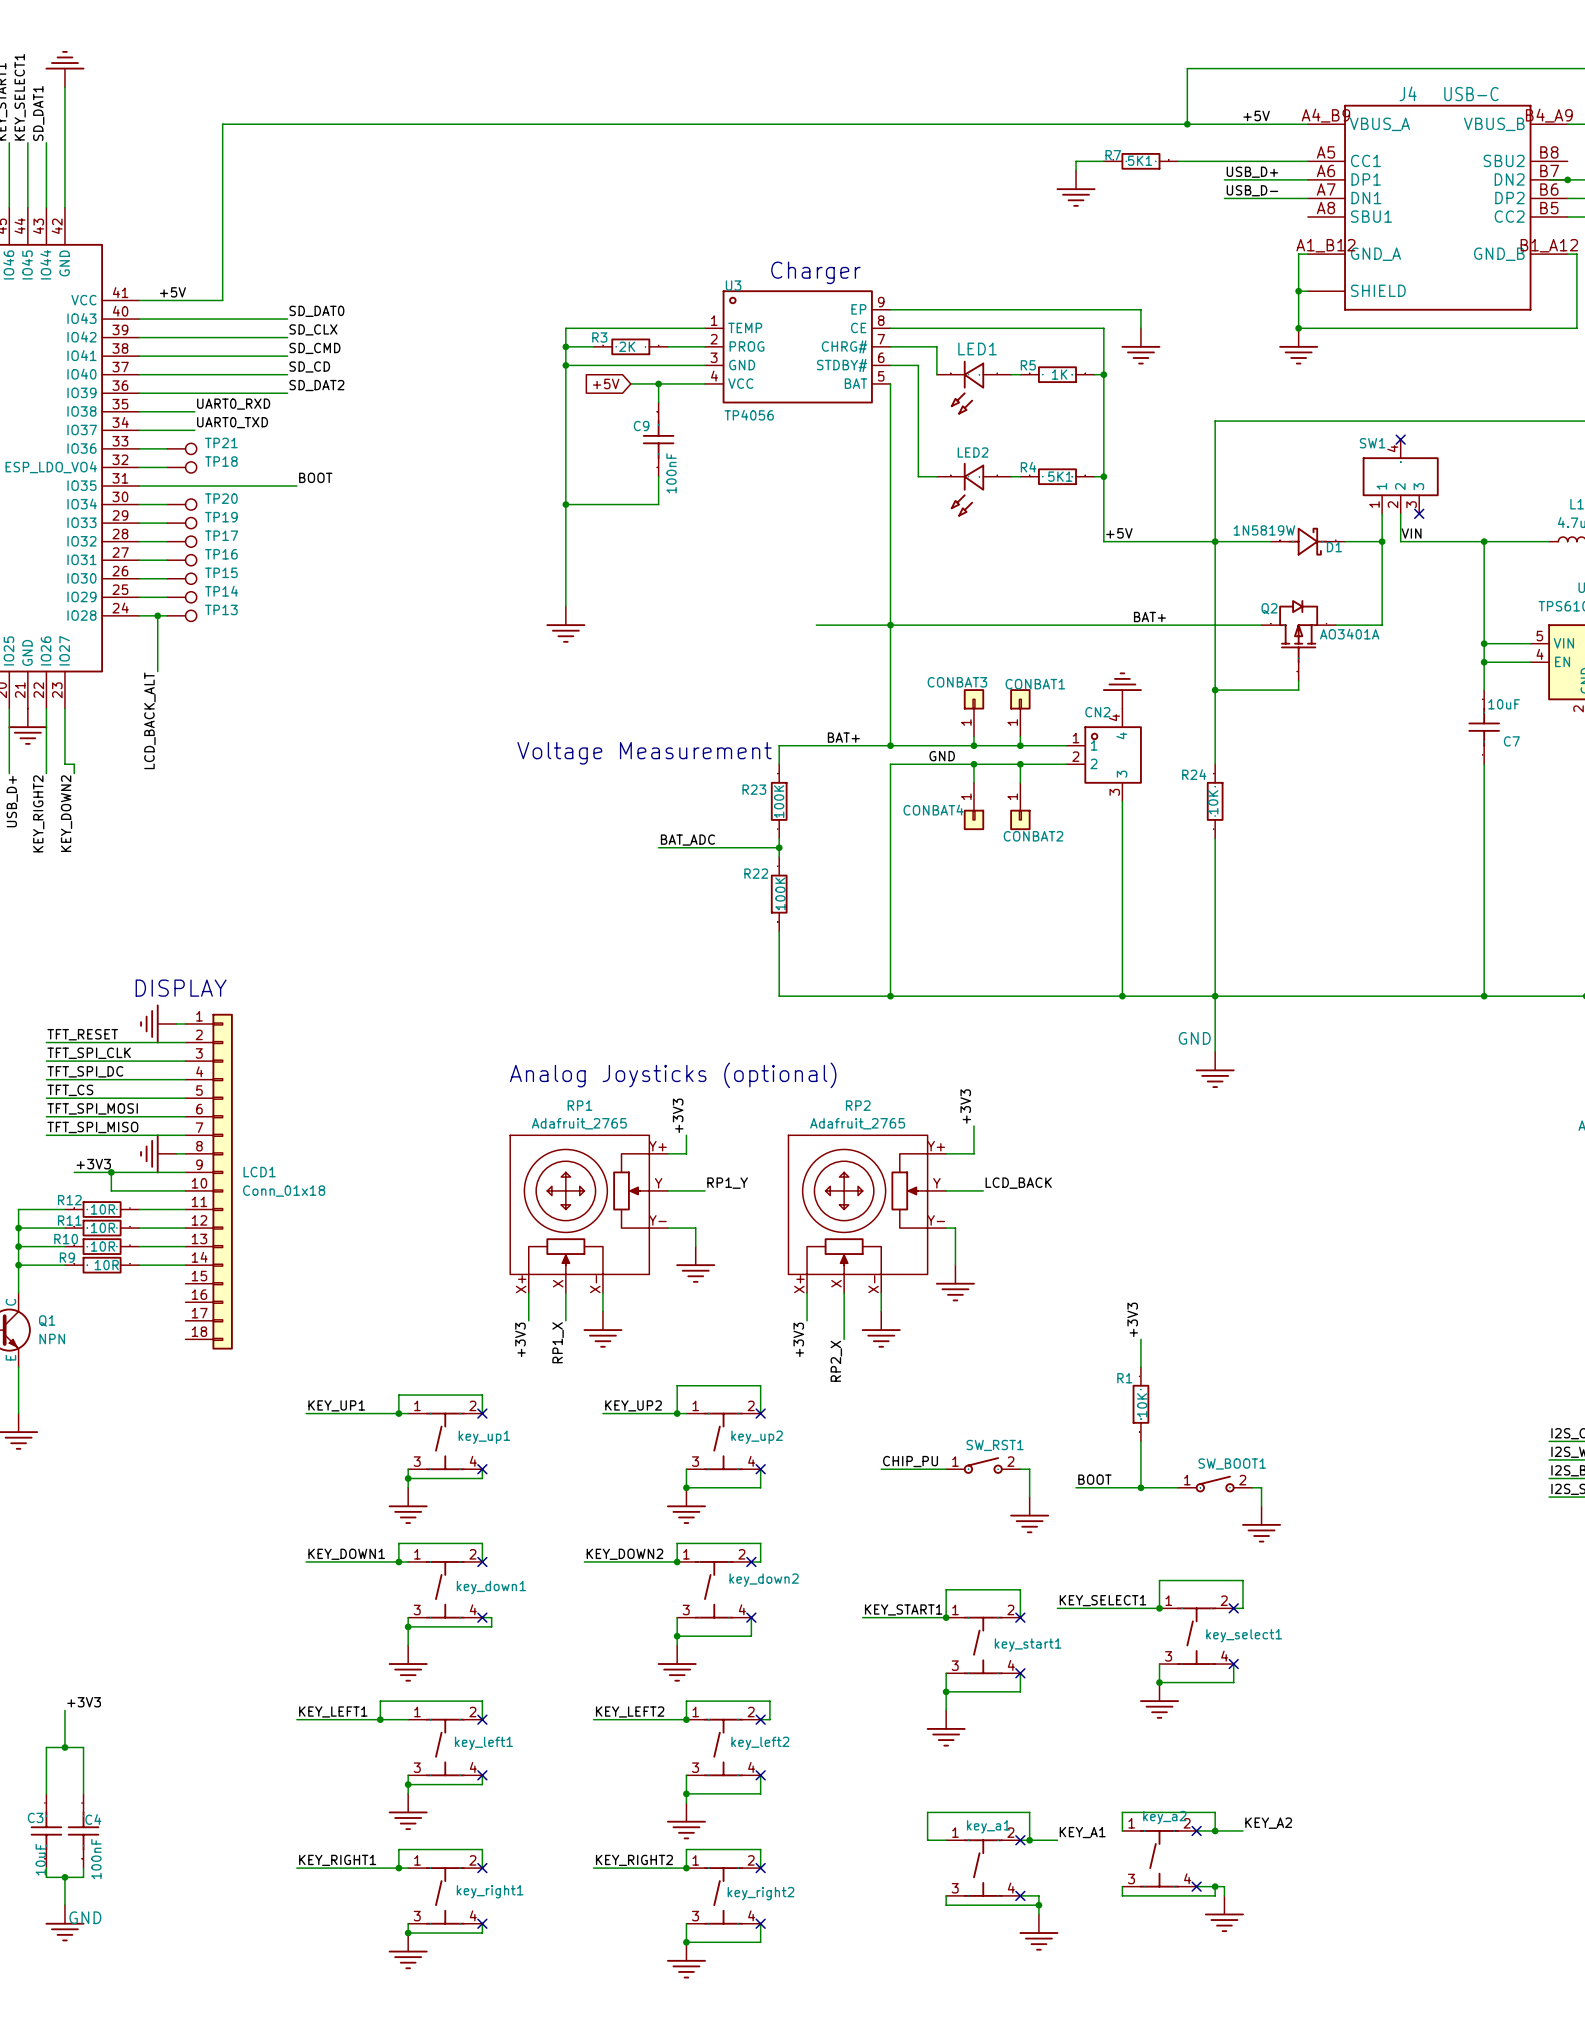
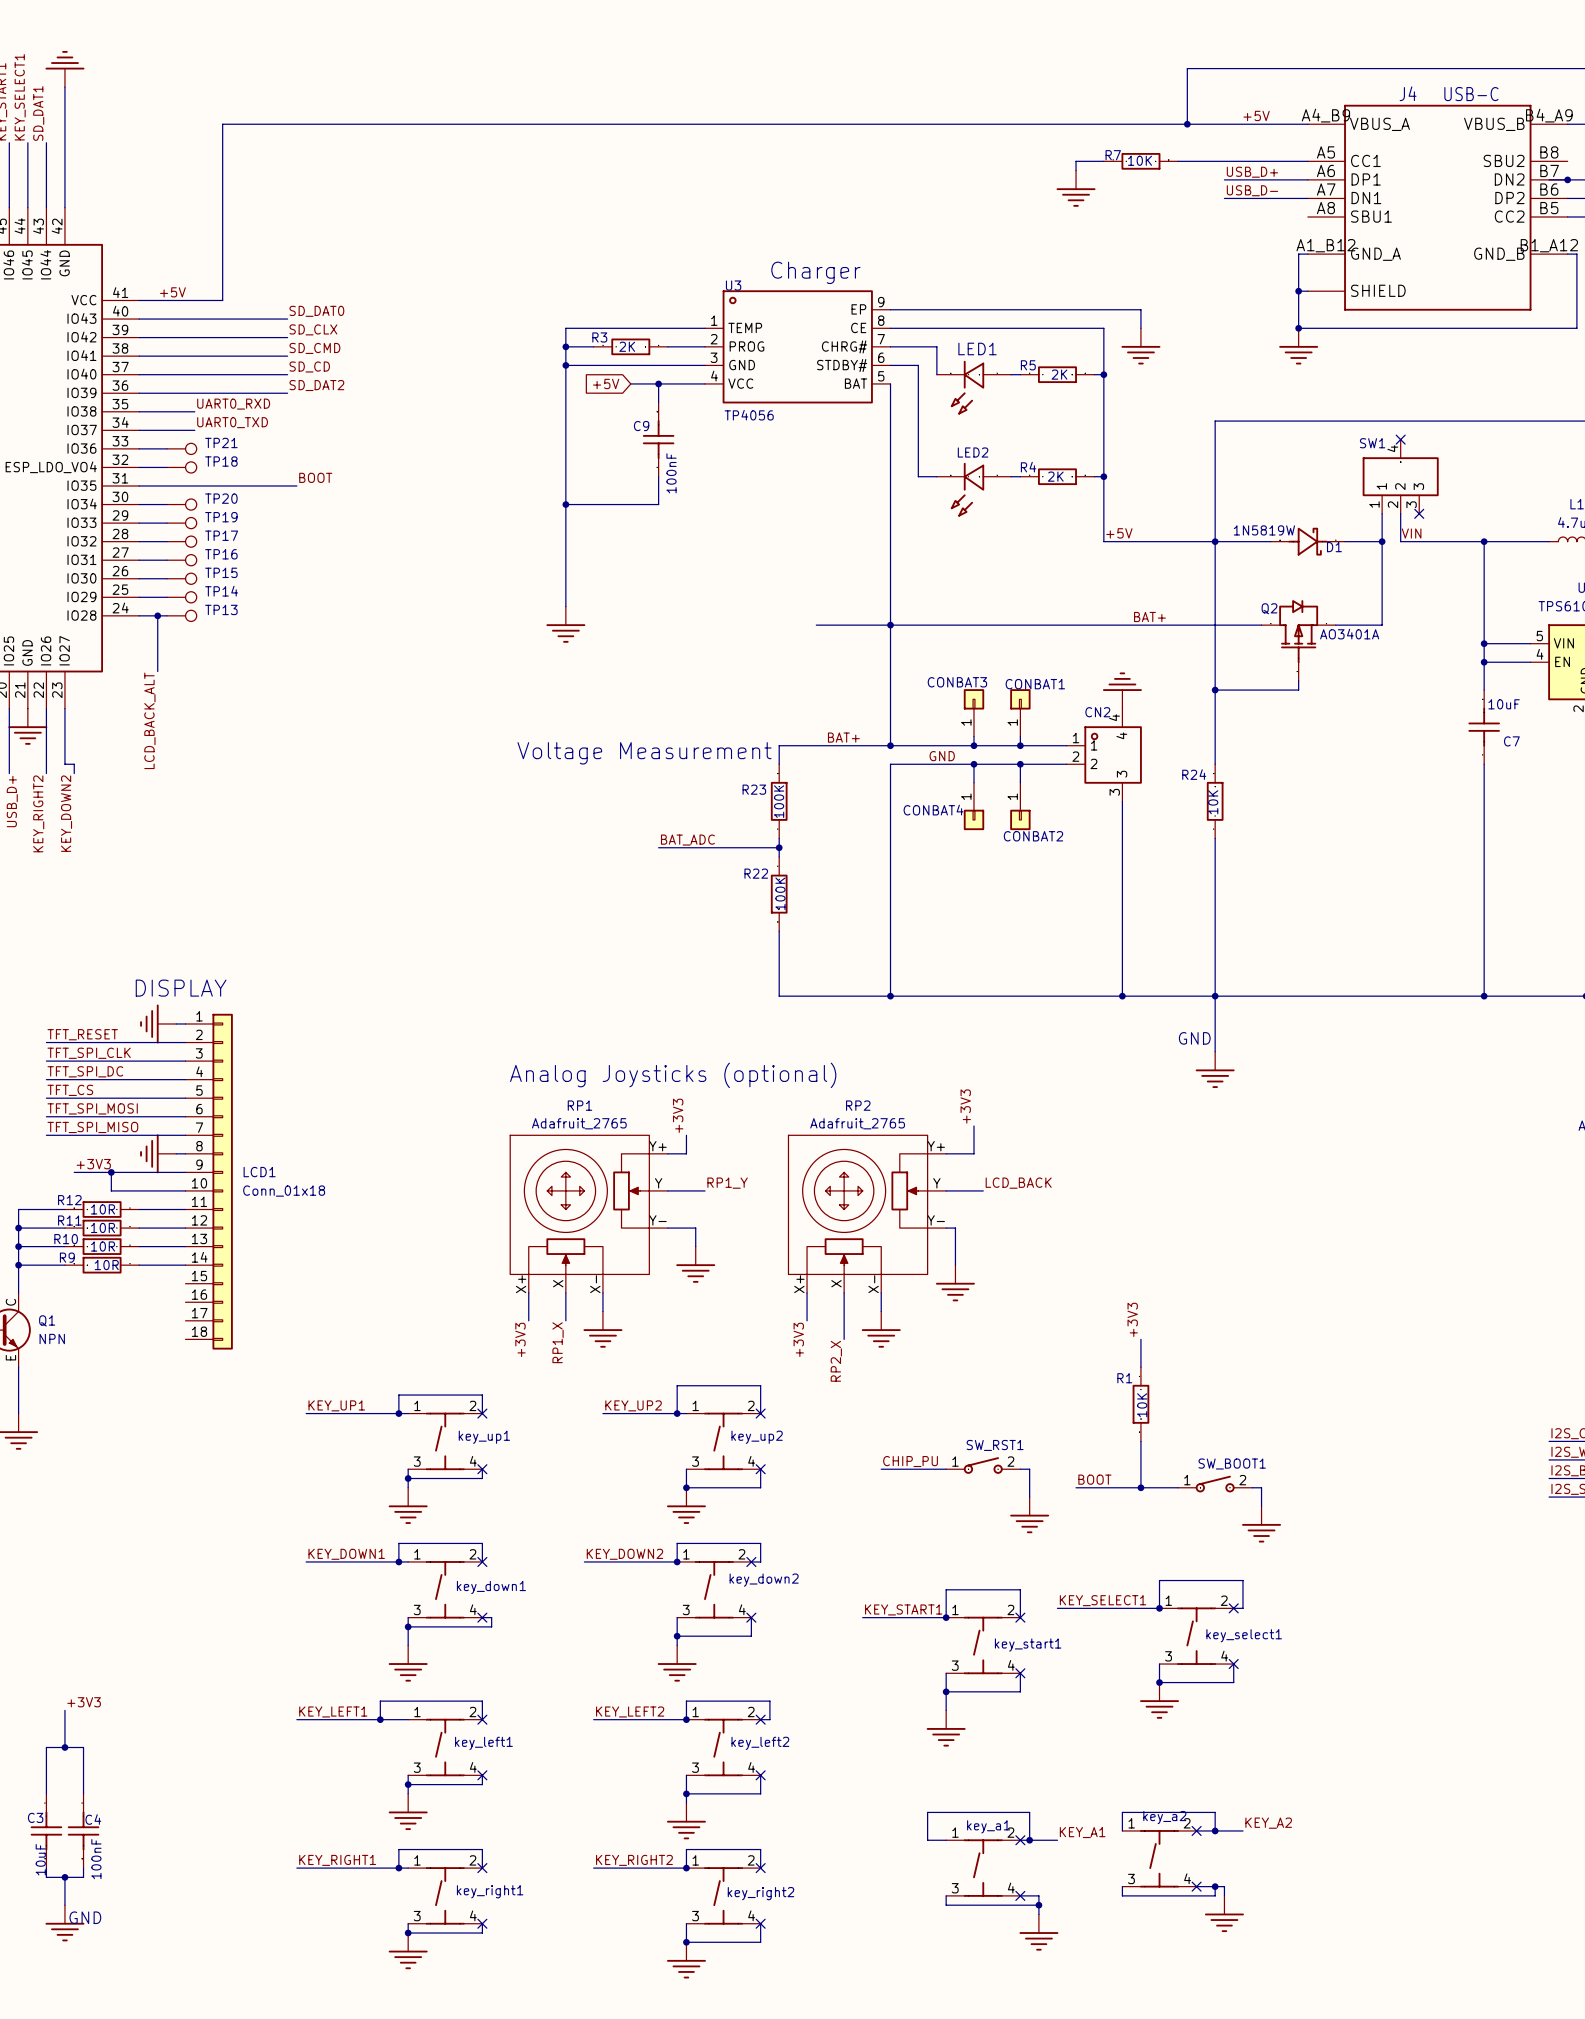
R7 value: 5K1 (1140, 160) -> 10K (1140, 160)
R5 value: 1K (1059, 374) -> 2K (1059, 374)
R4 value: 5K1 (1060, 476) -> 2K (1055, 476)

